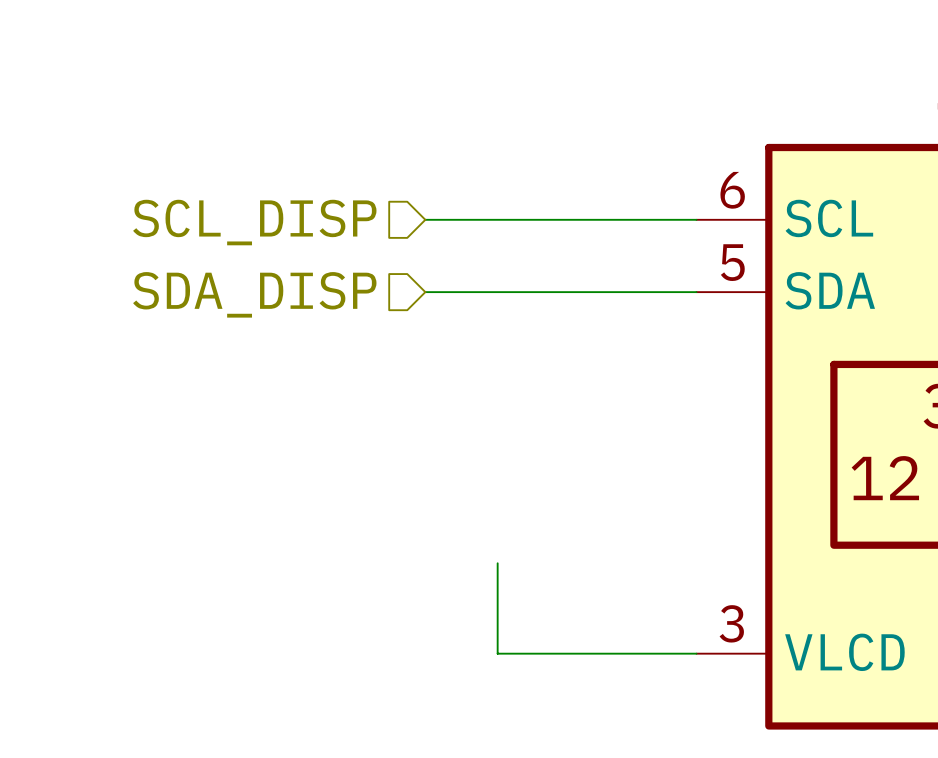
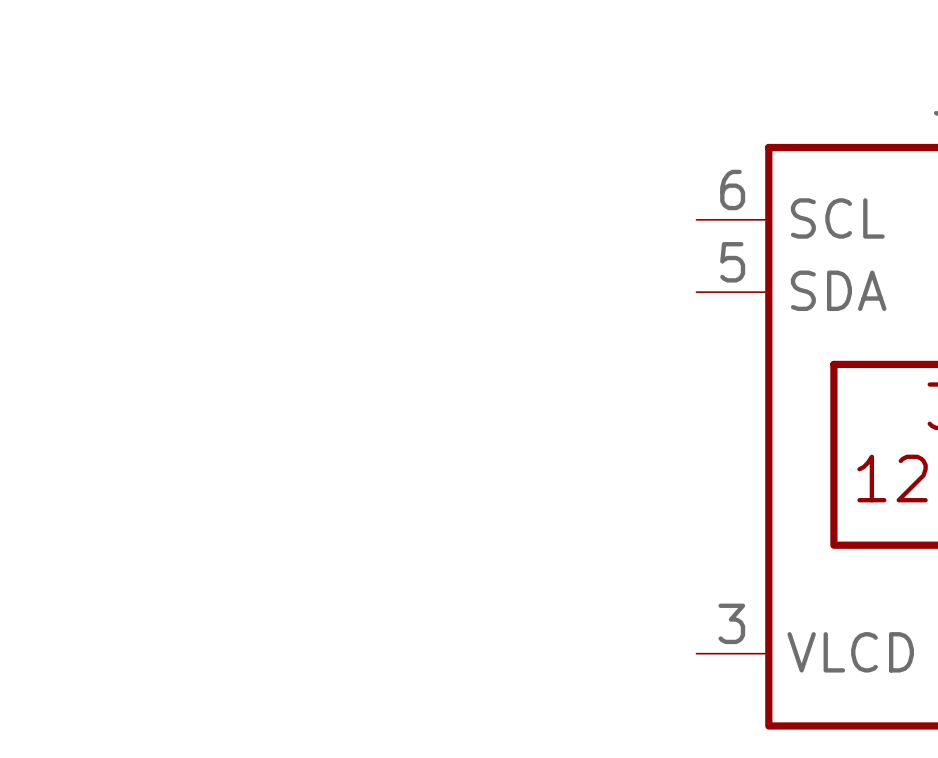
wire: (425, 219) (696, 219) -> none
hierarchical label: SCL_DISP (254, 222) -> none
wire: (425, 292) (696, 292) -> none
hierarchical label: SDA_DISP (254, 294) -> none
wire: (497, 563) (497, 653) (696, 653) -> none

